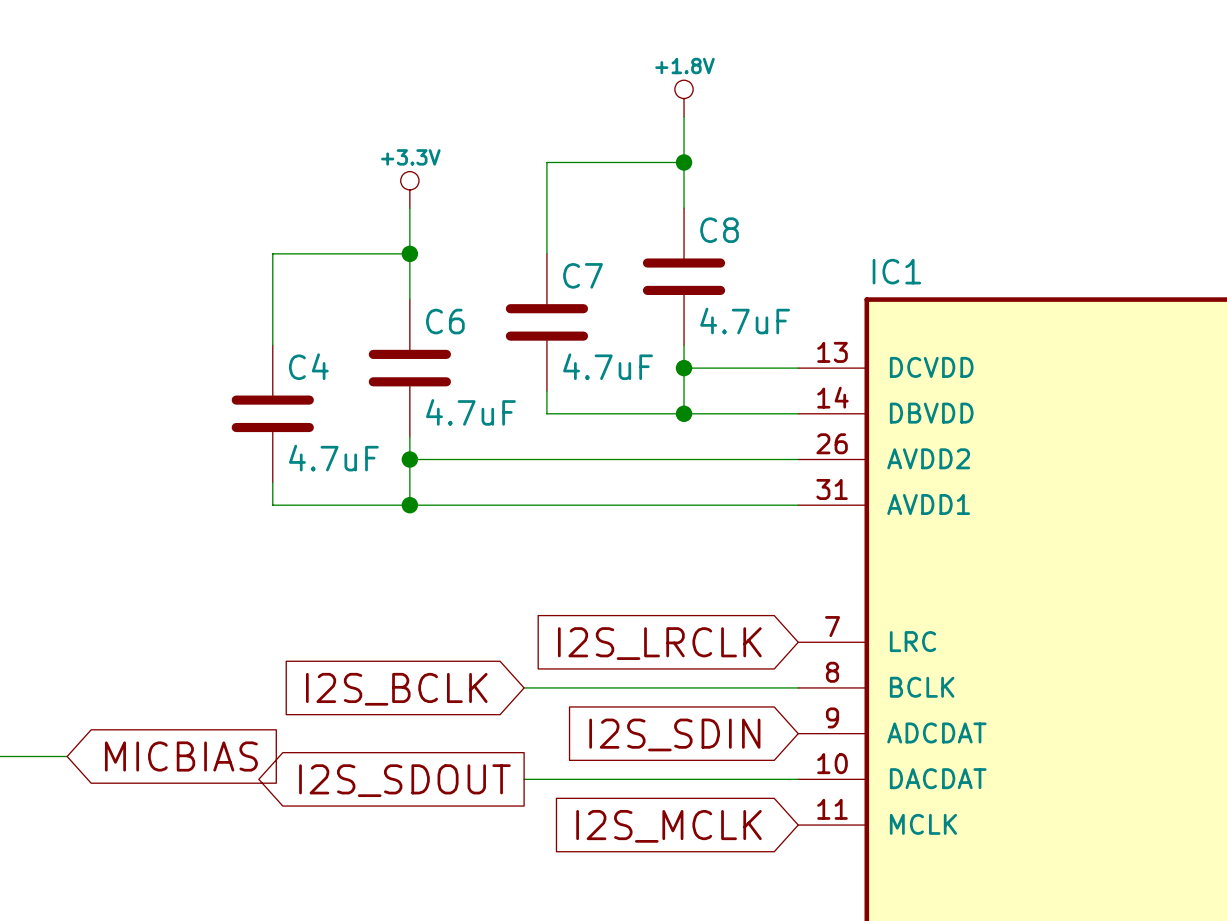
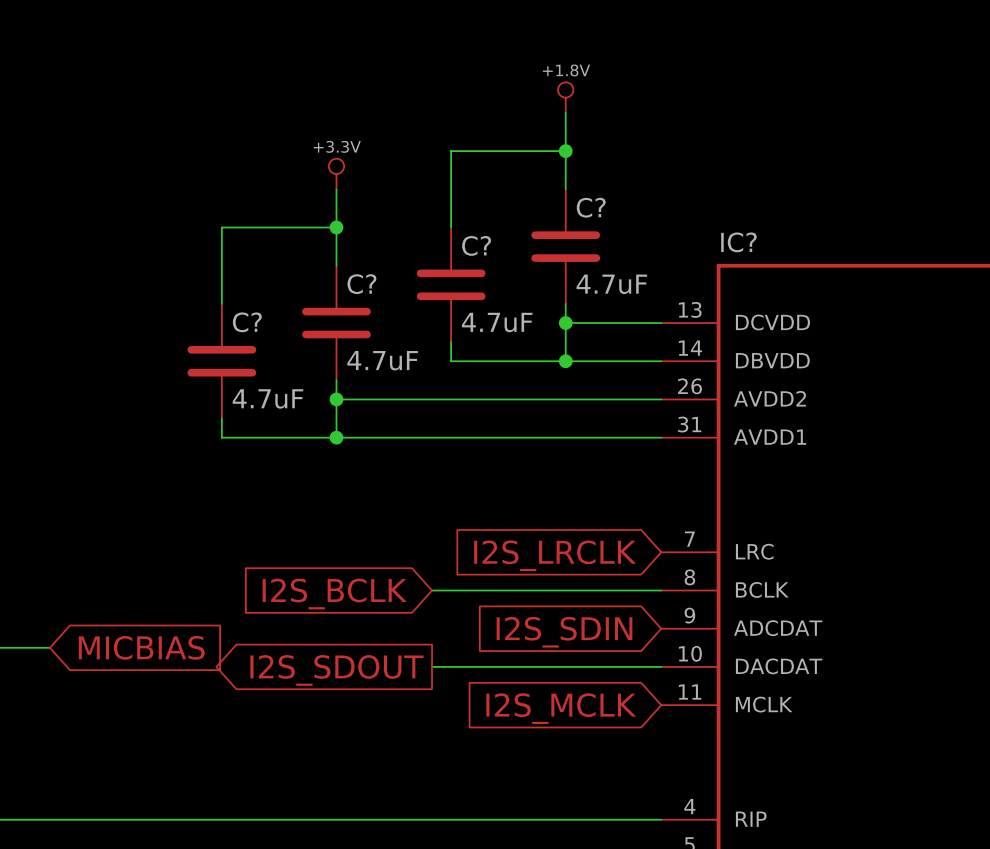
C8 name: C8 (719, 230) -> C? (591, 207)
IC1 name: IC1 (896, 271) -> IC? (738, 242)
C7 name: C7 (583, 275) -> C? (476, 245)
C6 name: C6 (445, 321) -> C? (361, 284)
C4 name: C4 (308, 366) -> C? (247, 322)

